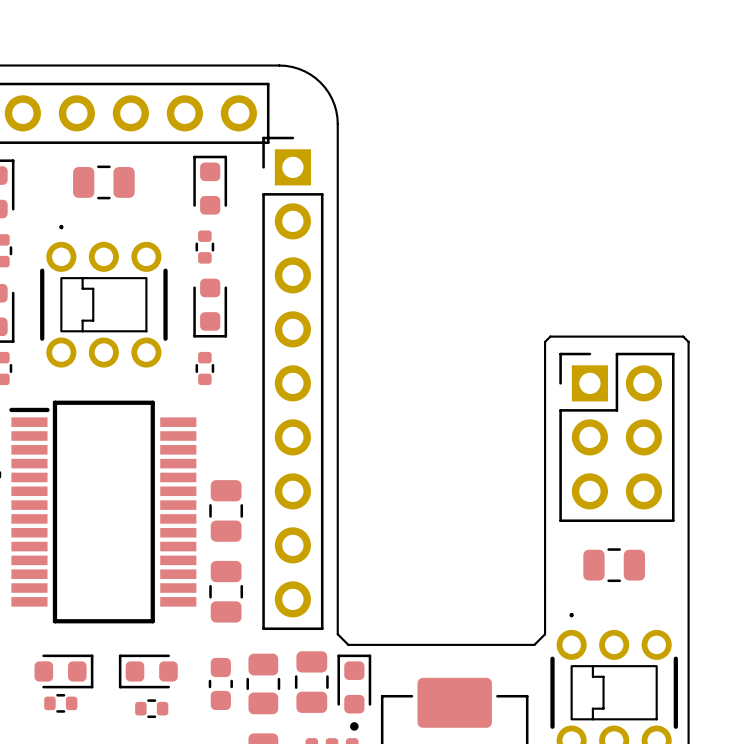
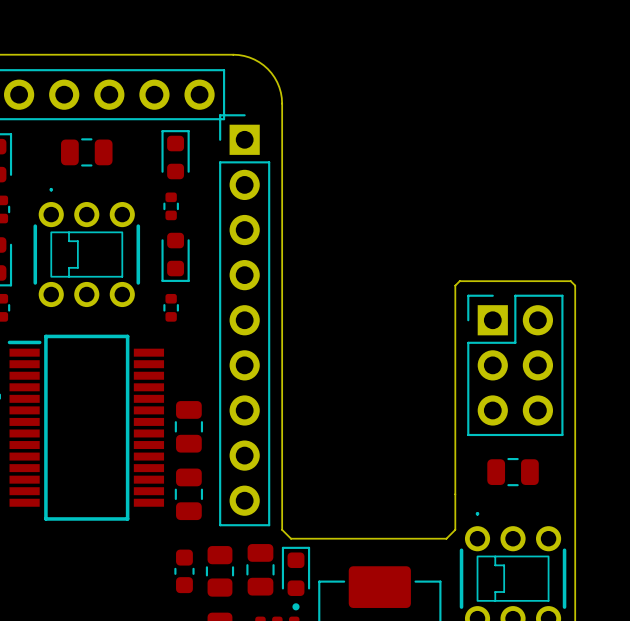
part: (63, 671) -> none
part: (148, 671) -> none
part: (60, 703) -> none
part: (151, 708) -> none

